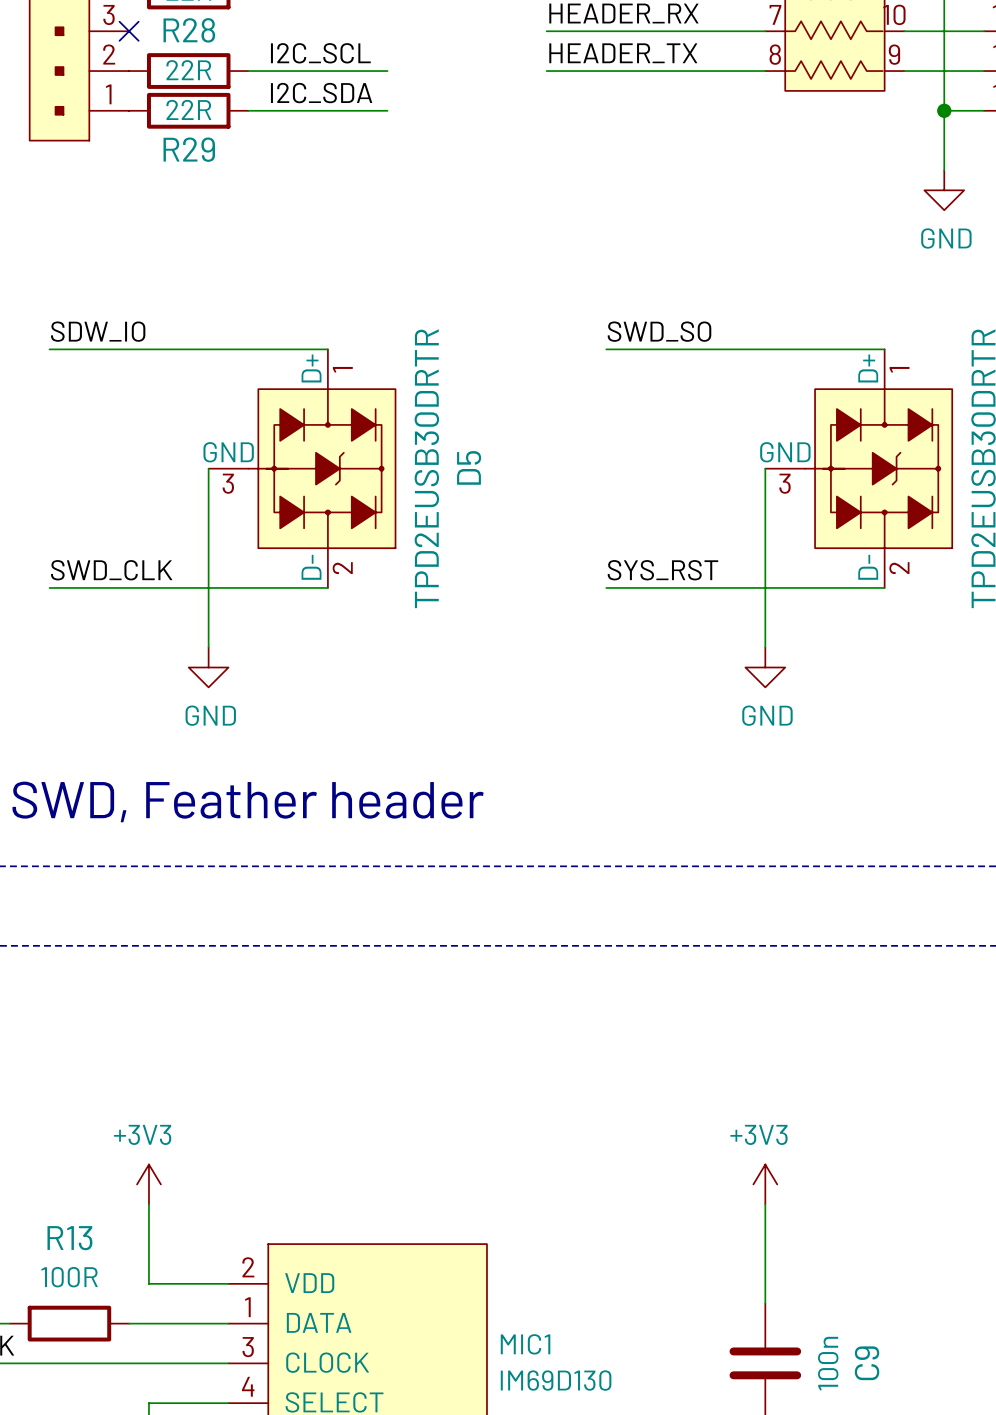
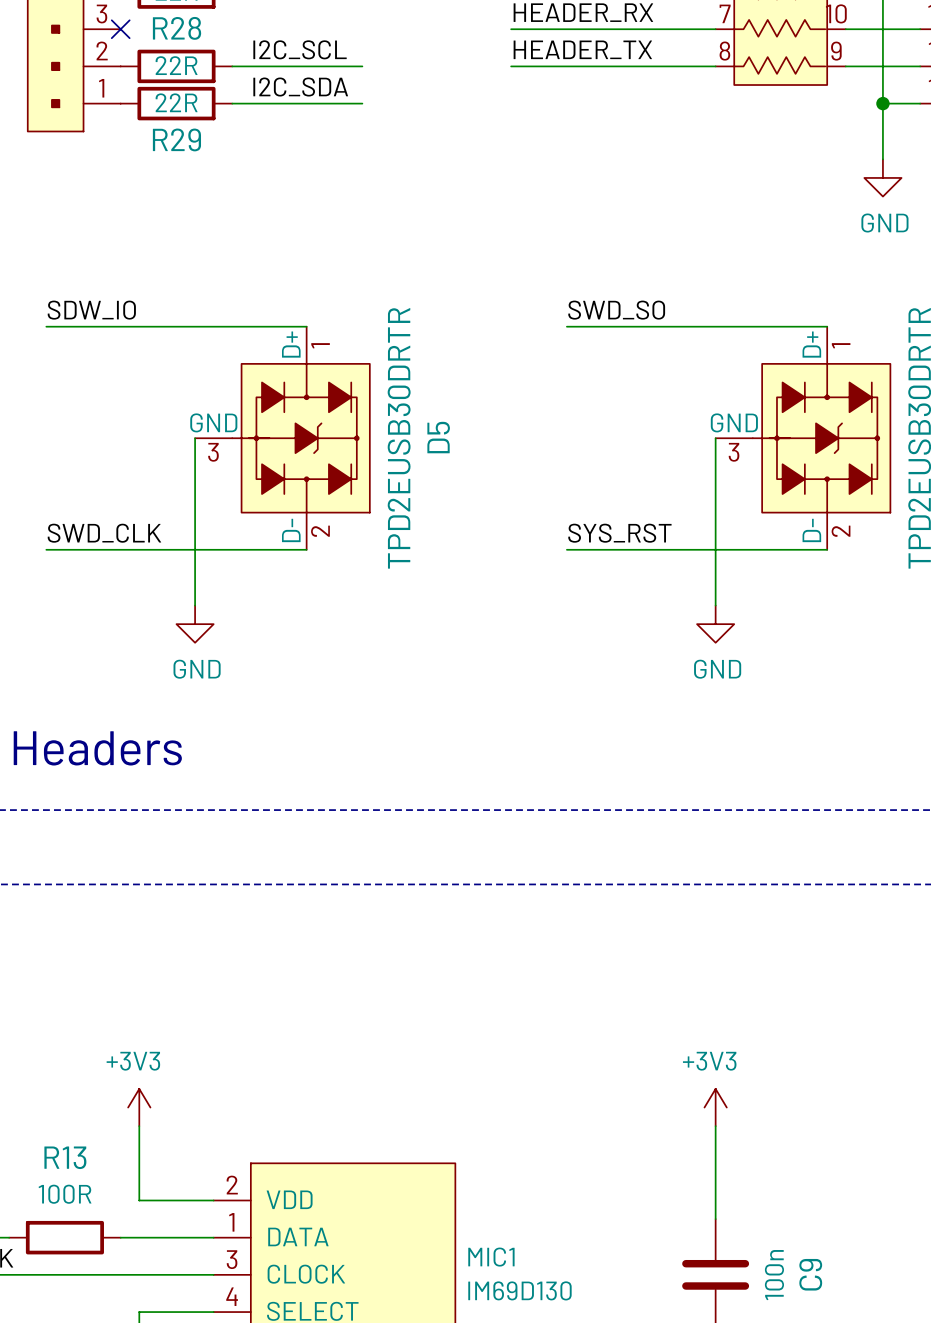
text: SWD, Feather header (248, 801) -> Headers (97, 748)

